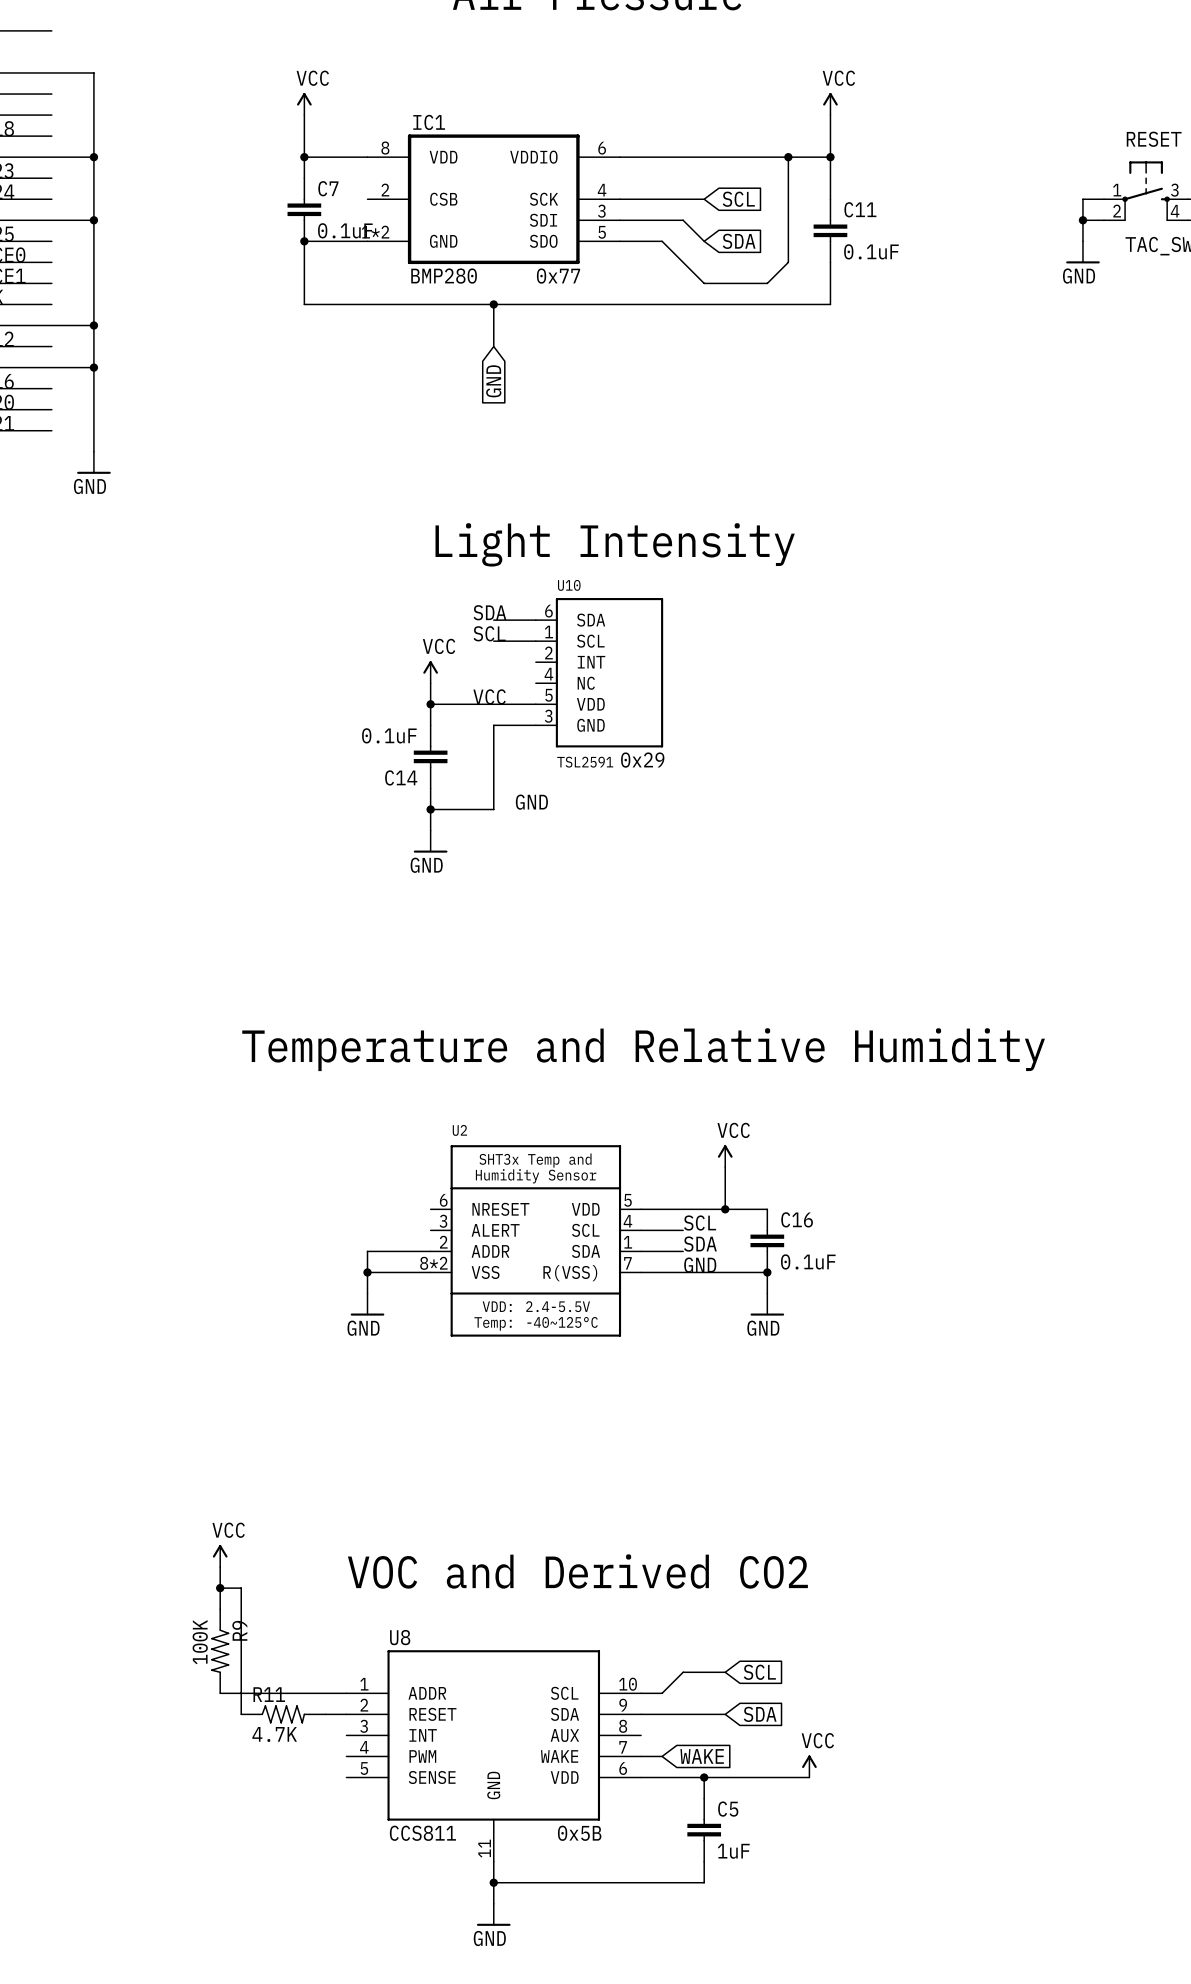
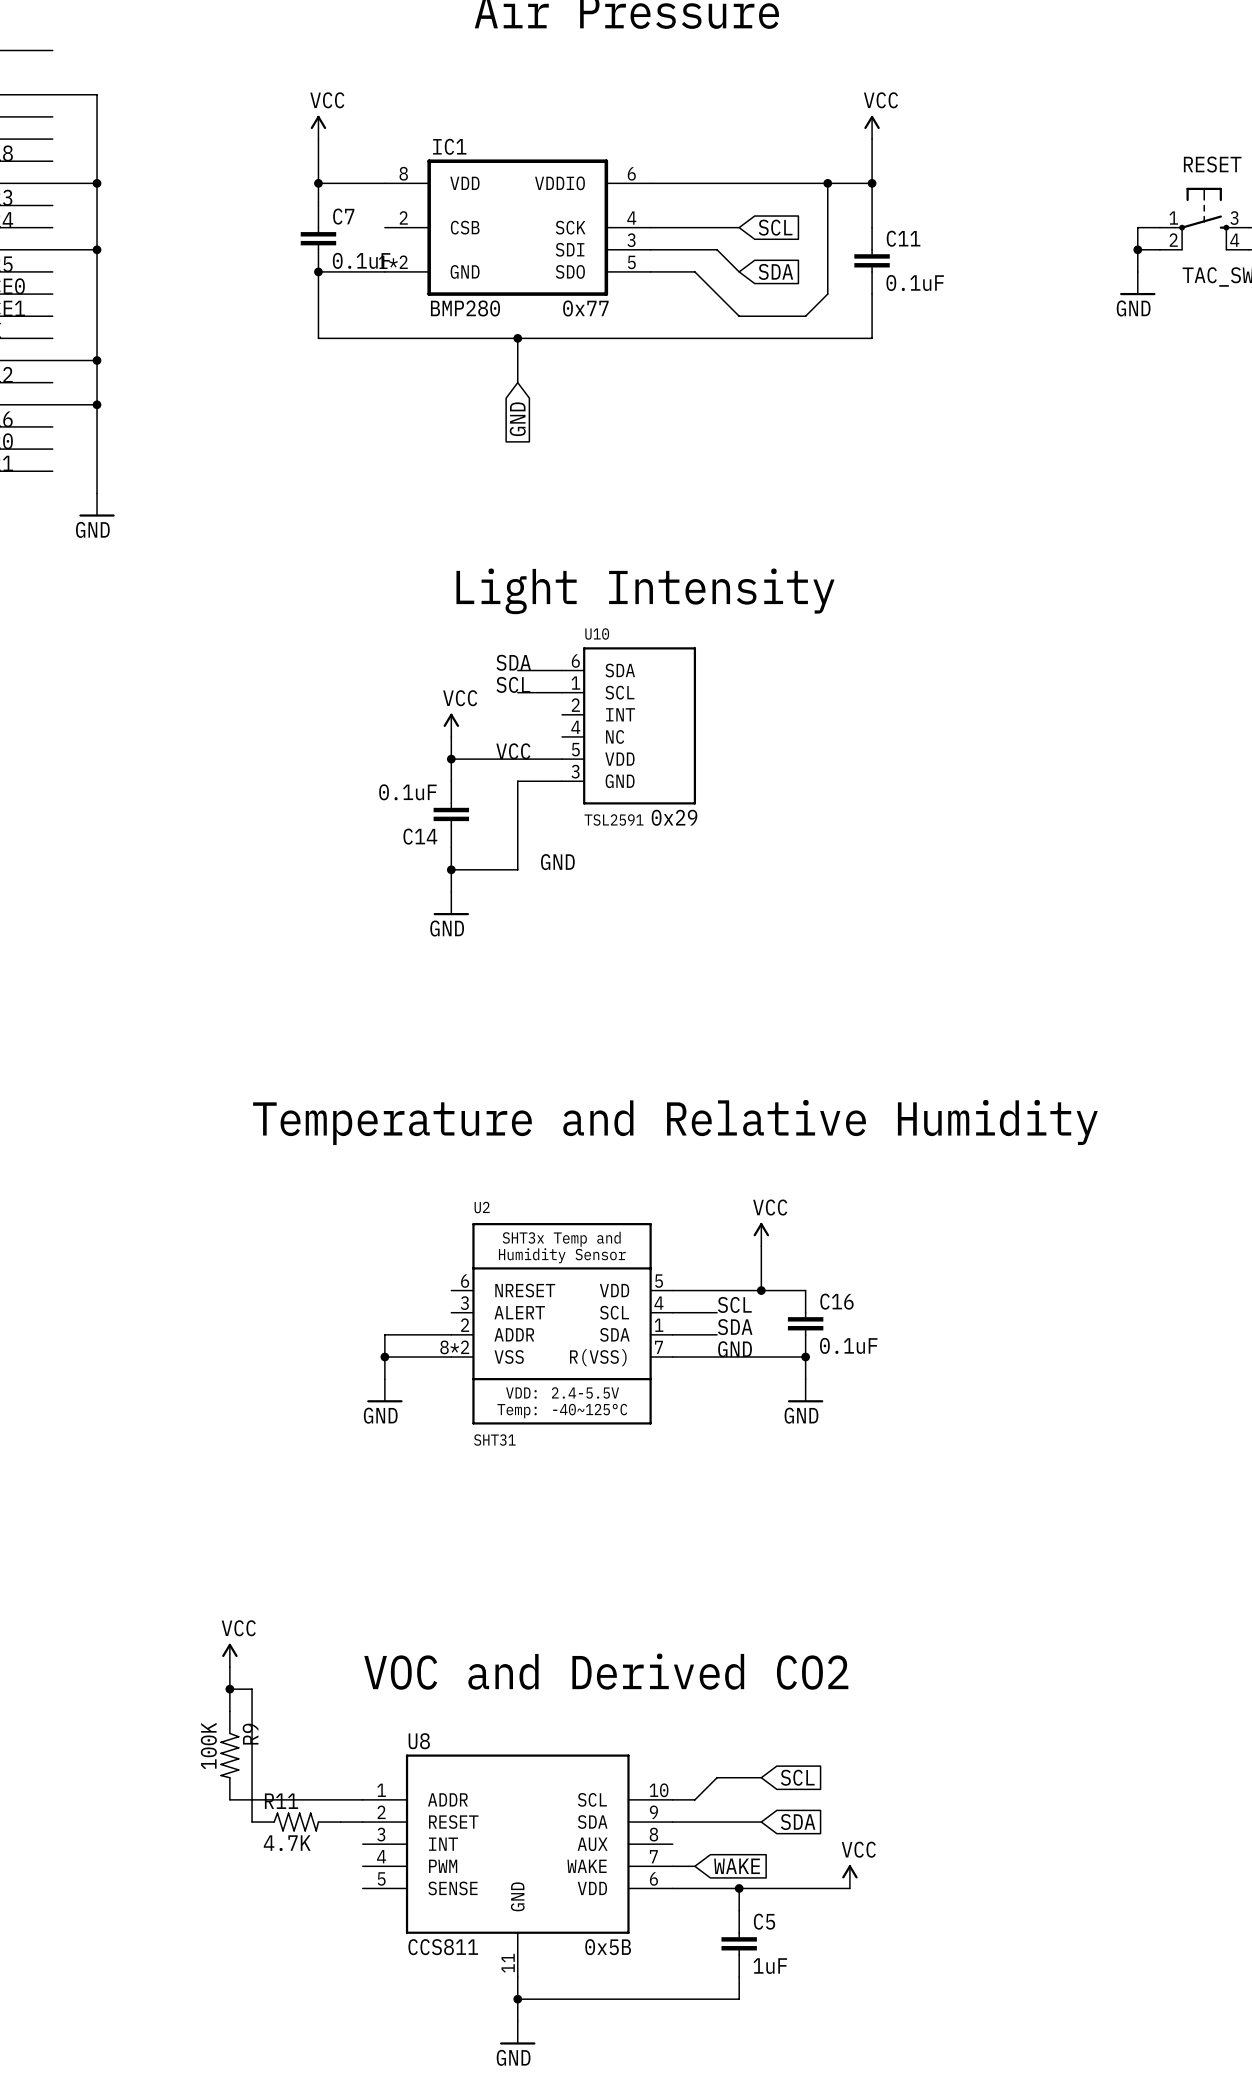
U2 value: none -> SHT31 (494, 1440)

